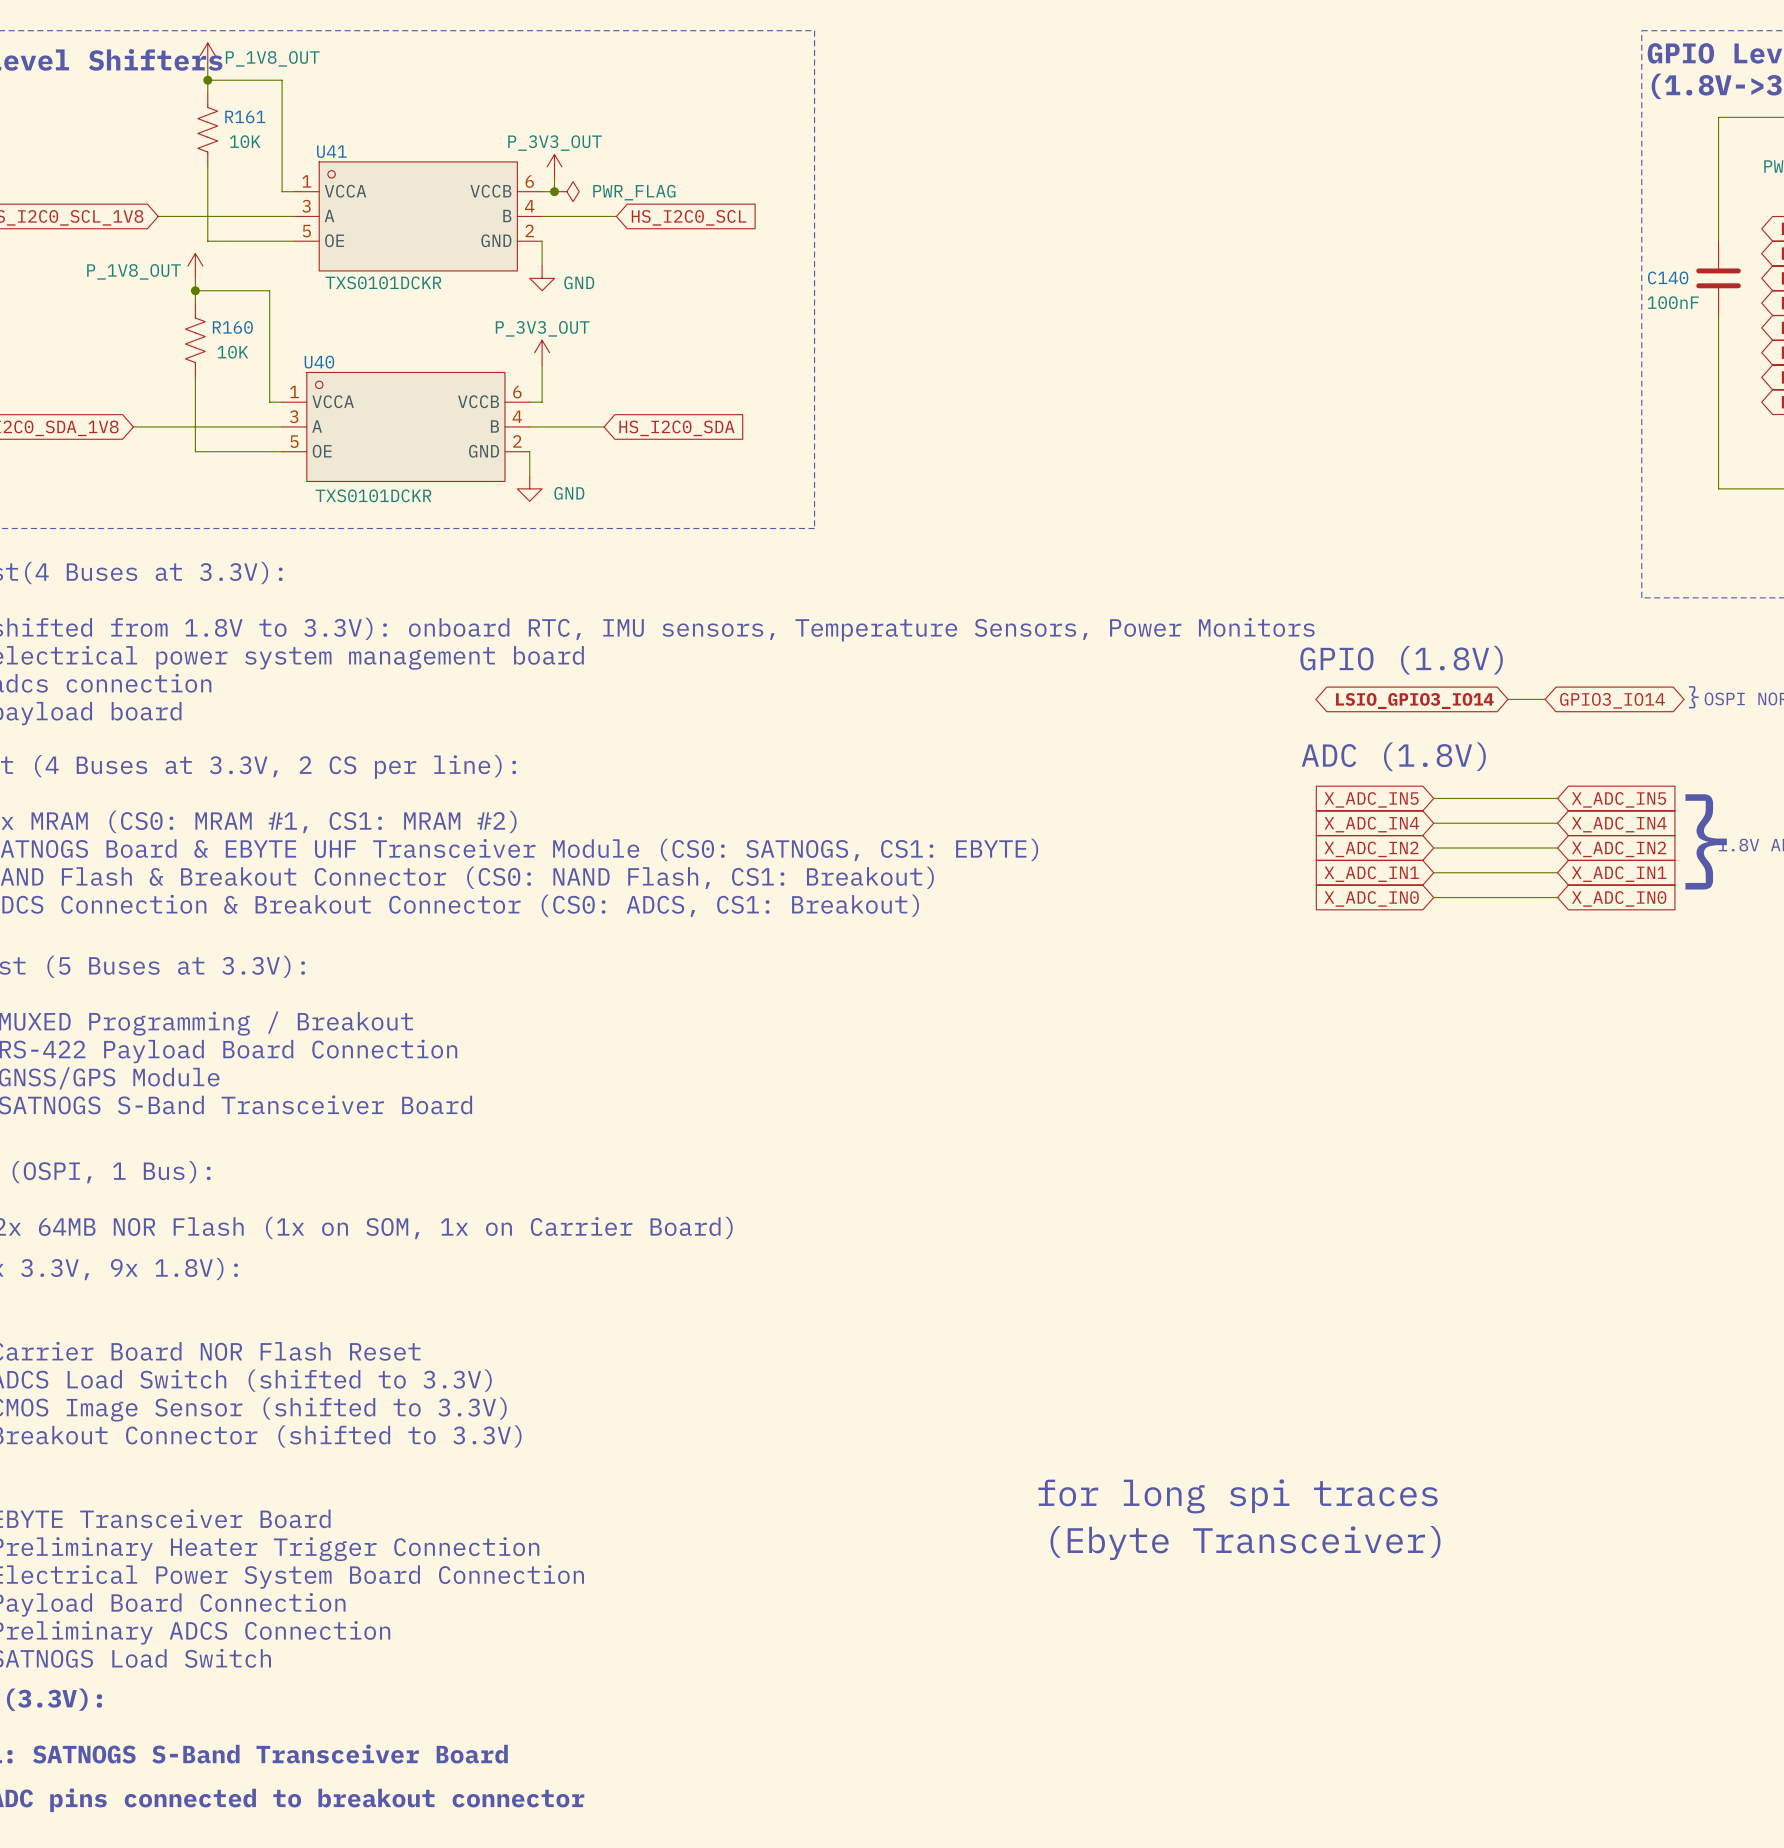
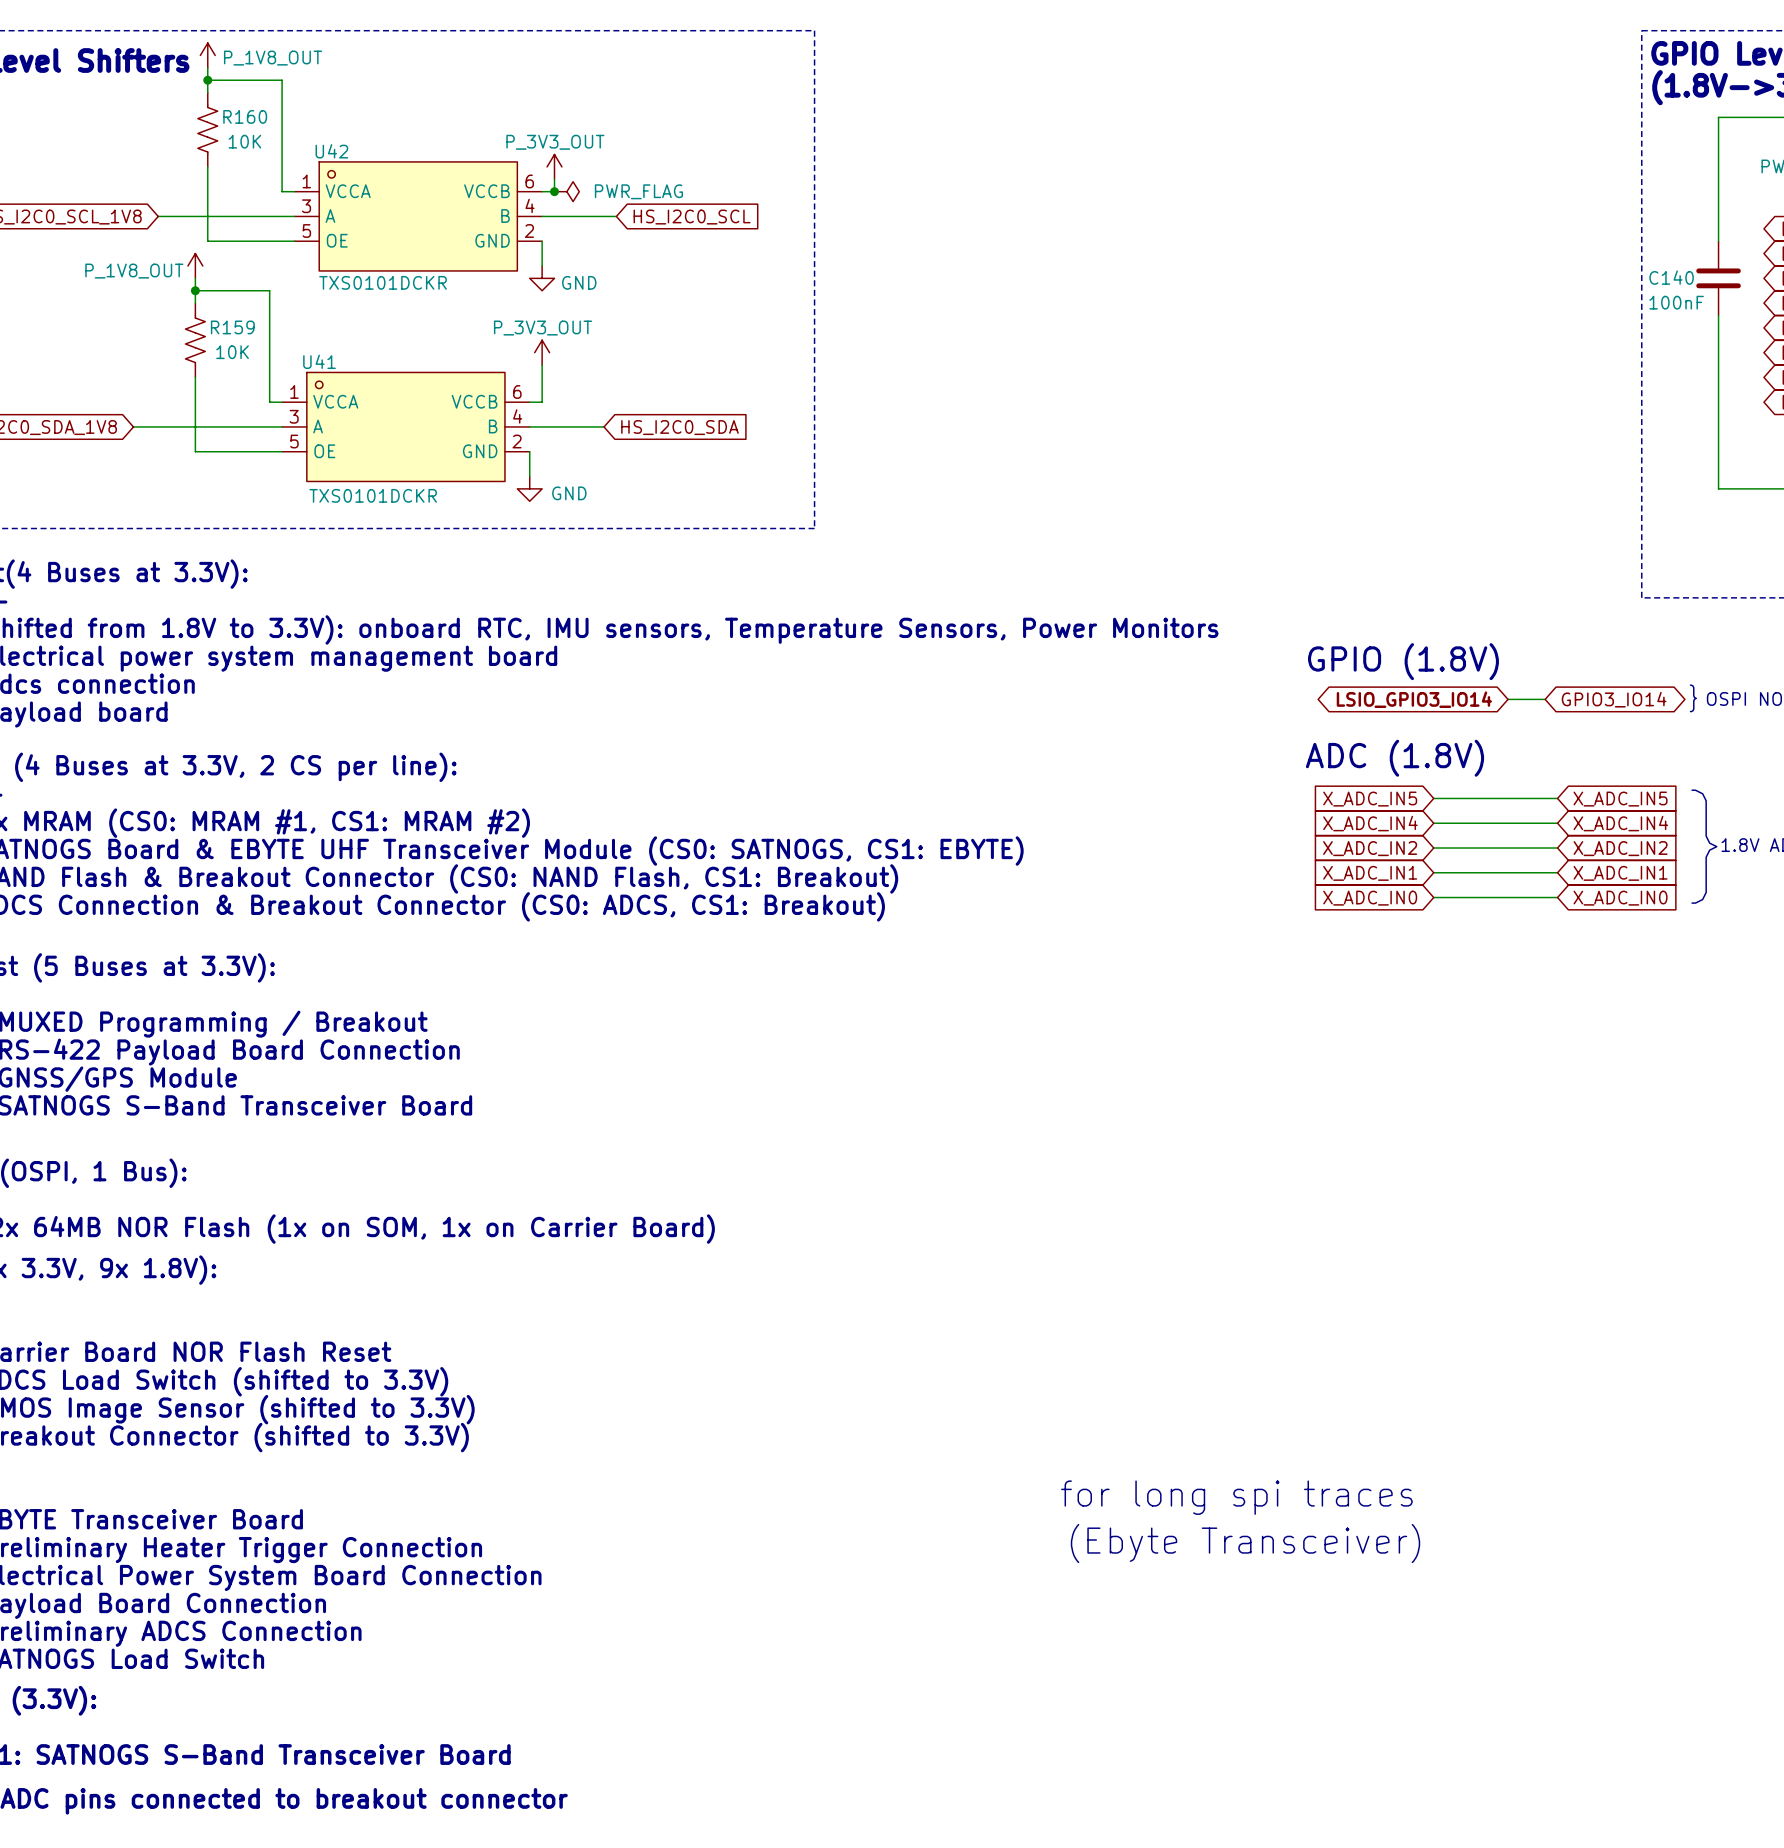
R161 name: R161 (245, 117) -> R160 (245, 116)
U41 name: U41 (331, 151) -> U42 (331, 151)
R160 name: R160 (232, 327) -> R159 (232, 327)
U40 name: U40 (319, 362) -> U41 (319, 361)

